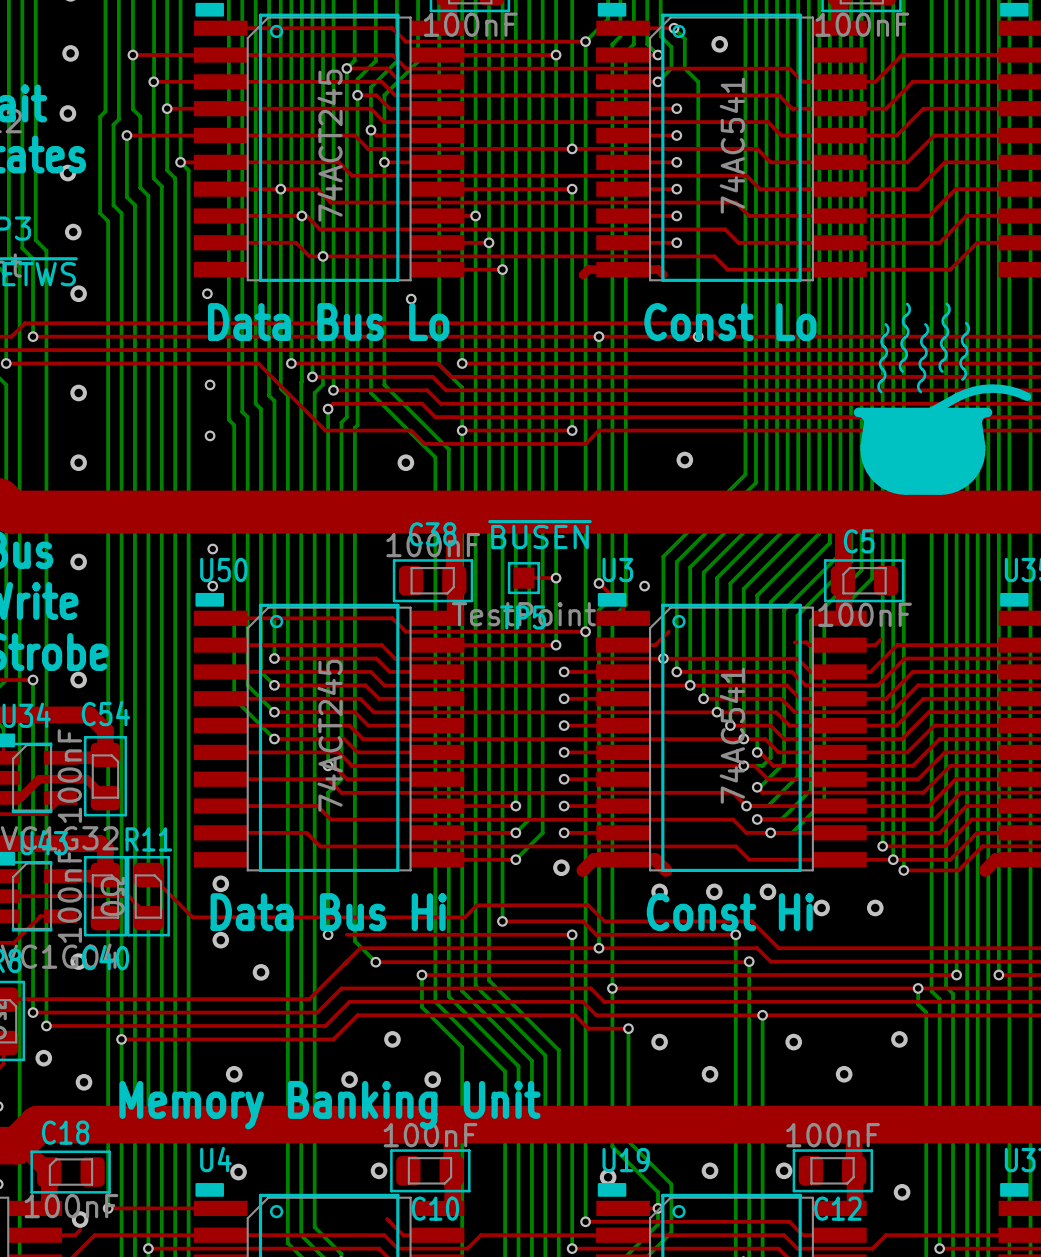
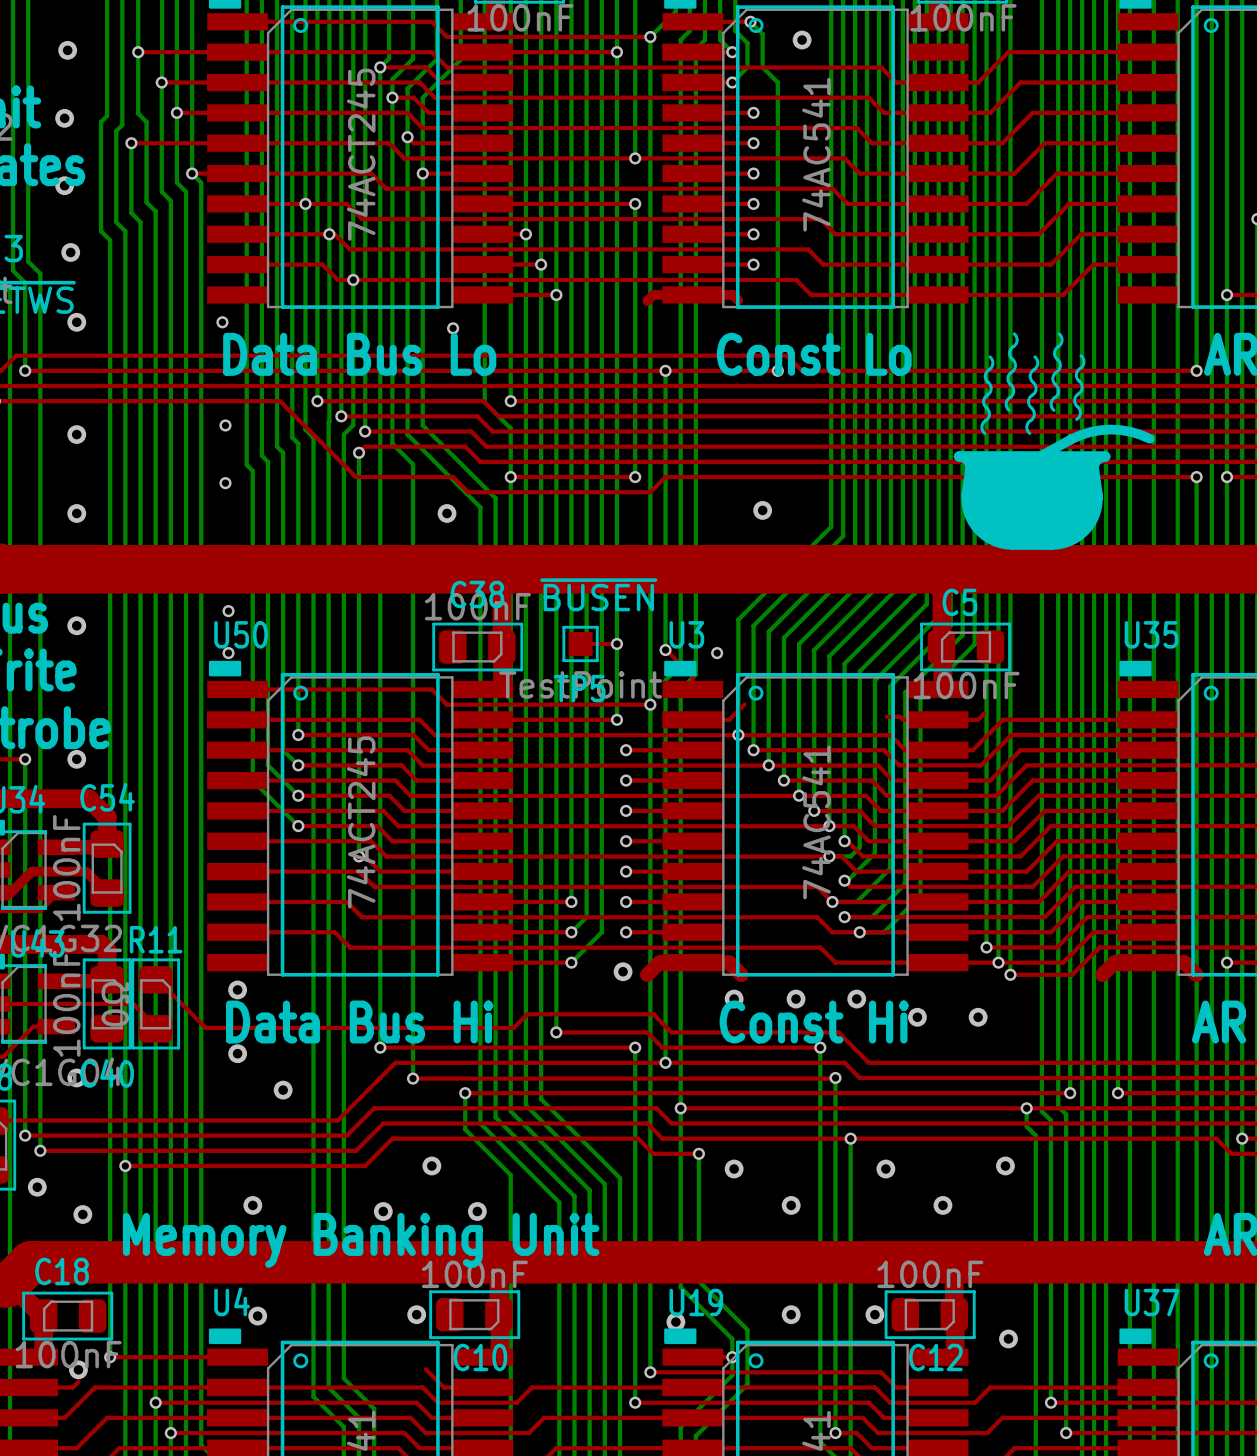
bottom track: (357, 401) (357, 425) (354, 427) (354, 941) (375, 962) -> (392, 443) (413, 464) (413, 1078)
bottom track: (346, 417) (341, 422) (341, 779) (328, 792) (328, 934) -> (380, 461) (380, 1047)
via position: (328, 934) -> (380, 1047)

